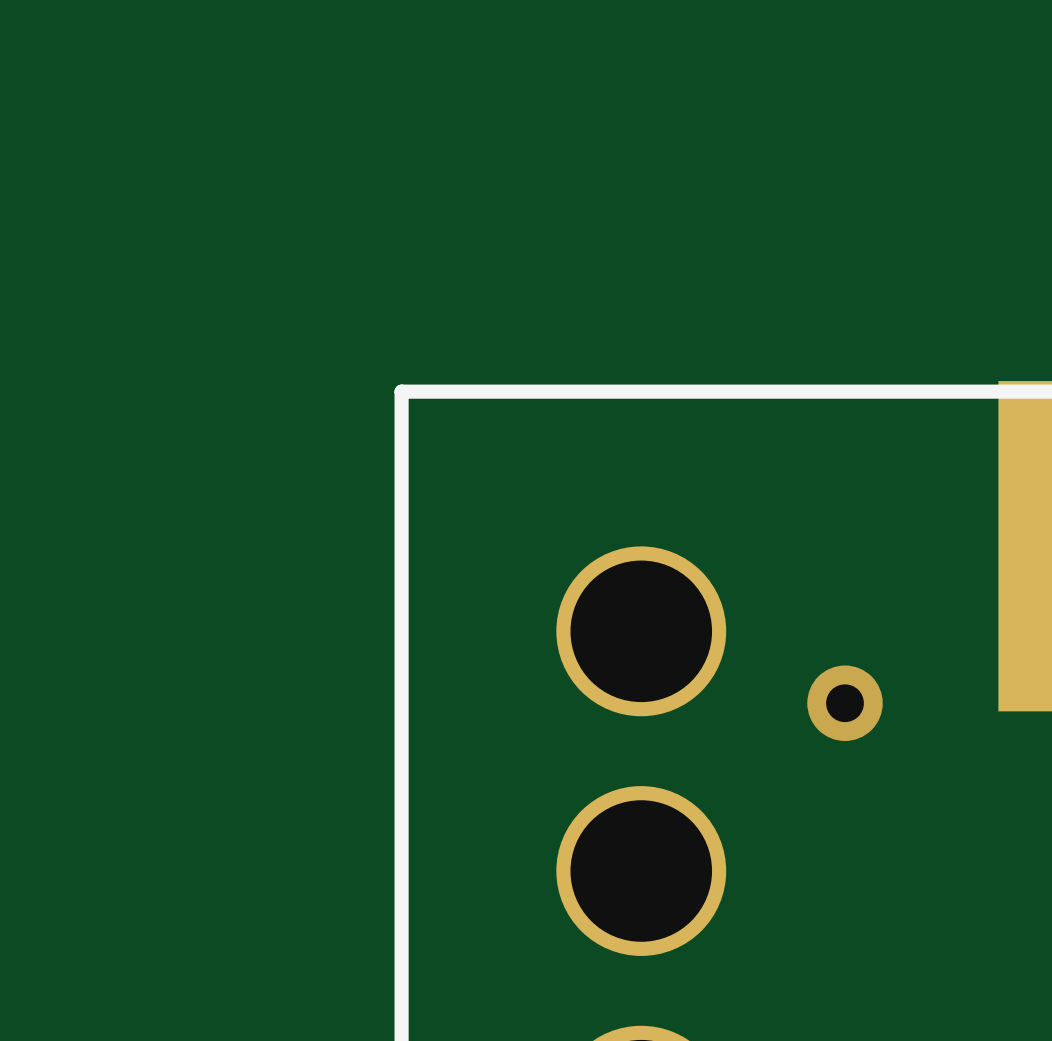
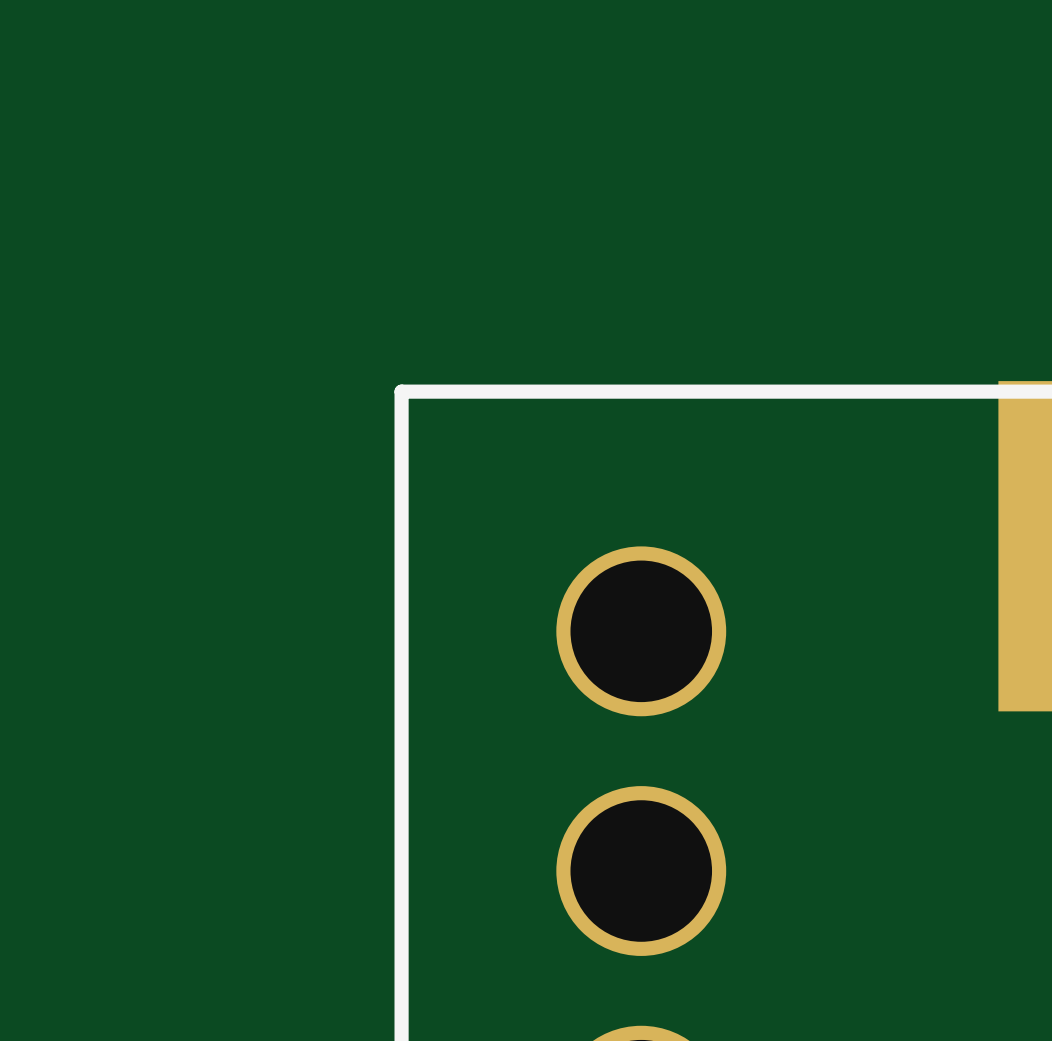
via: (845, 703) -> none

